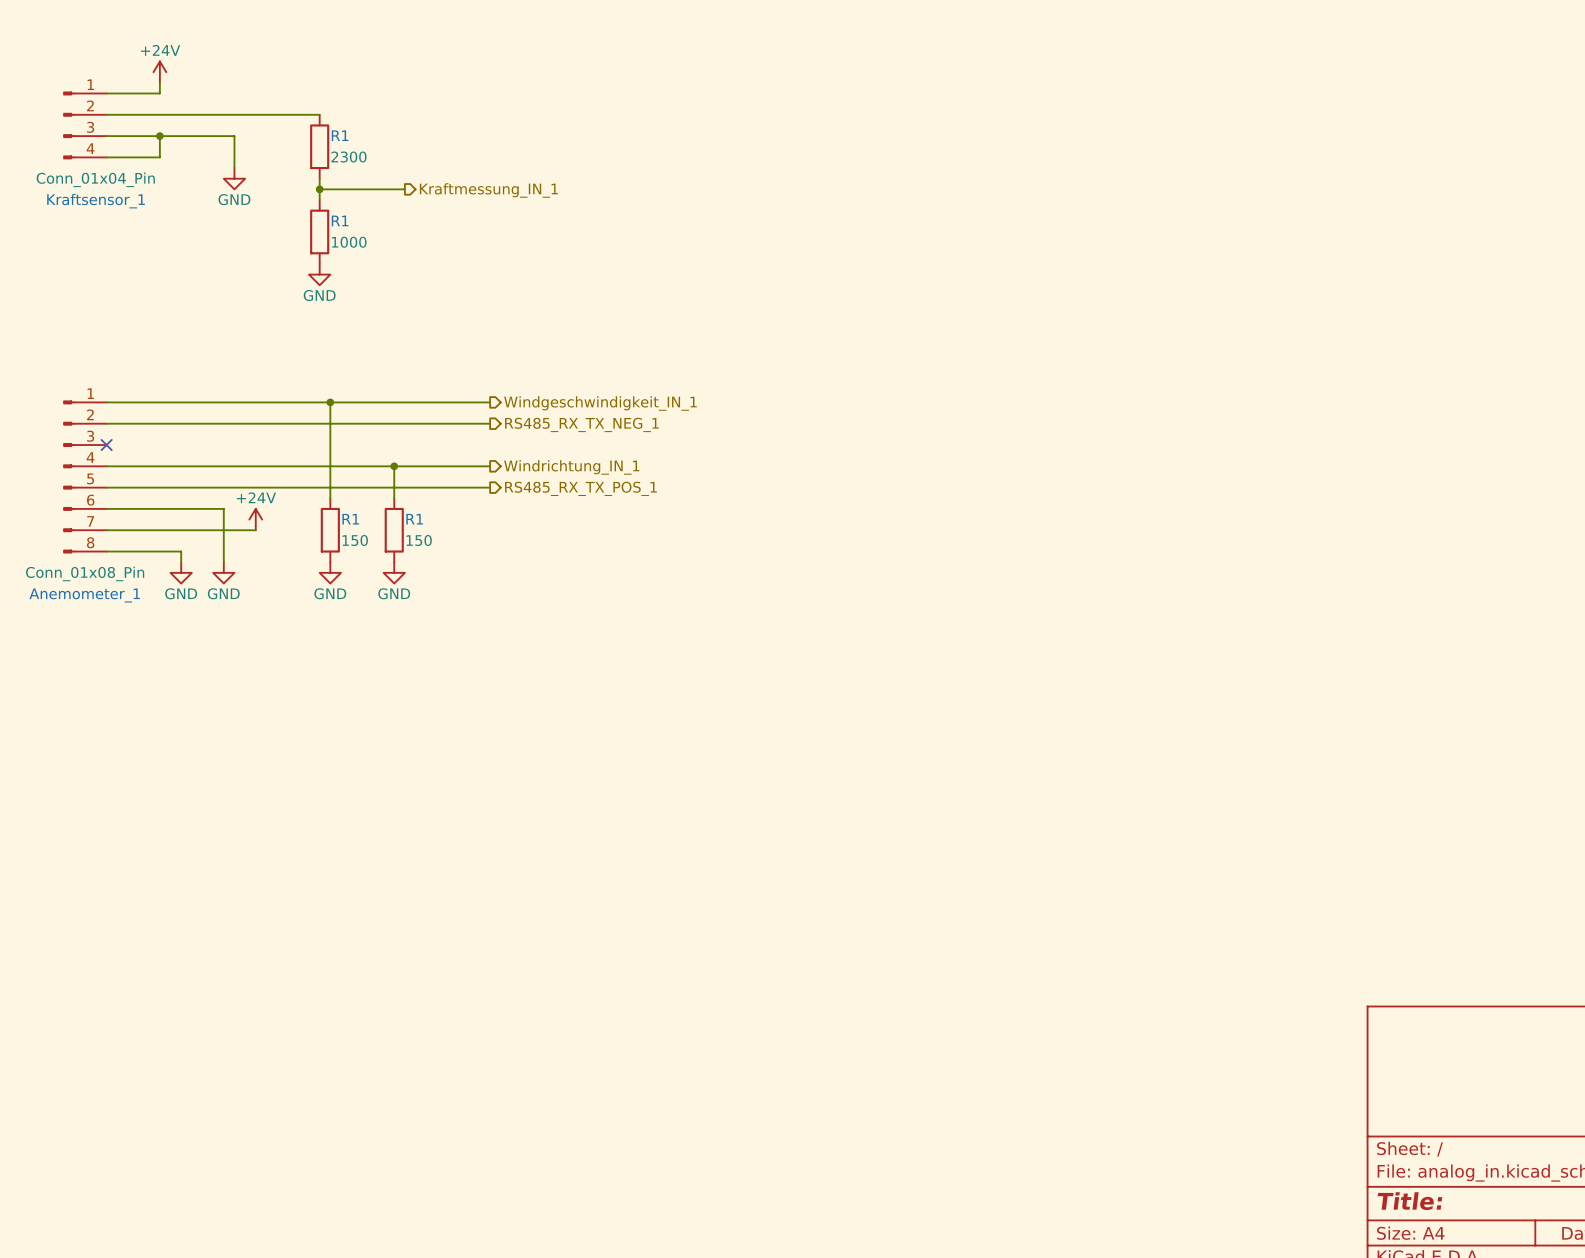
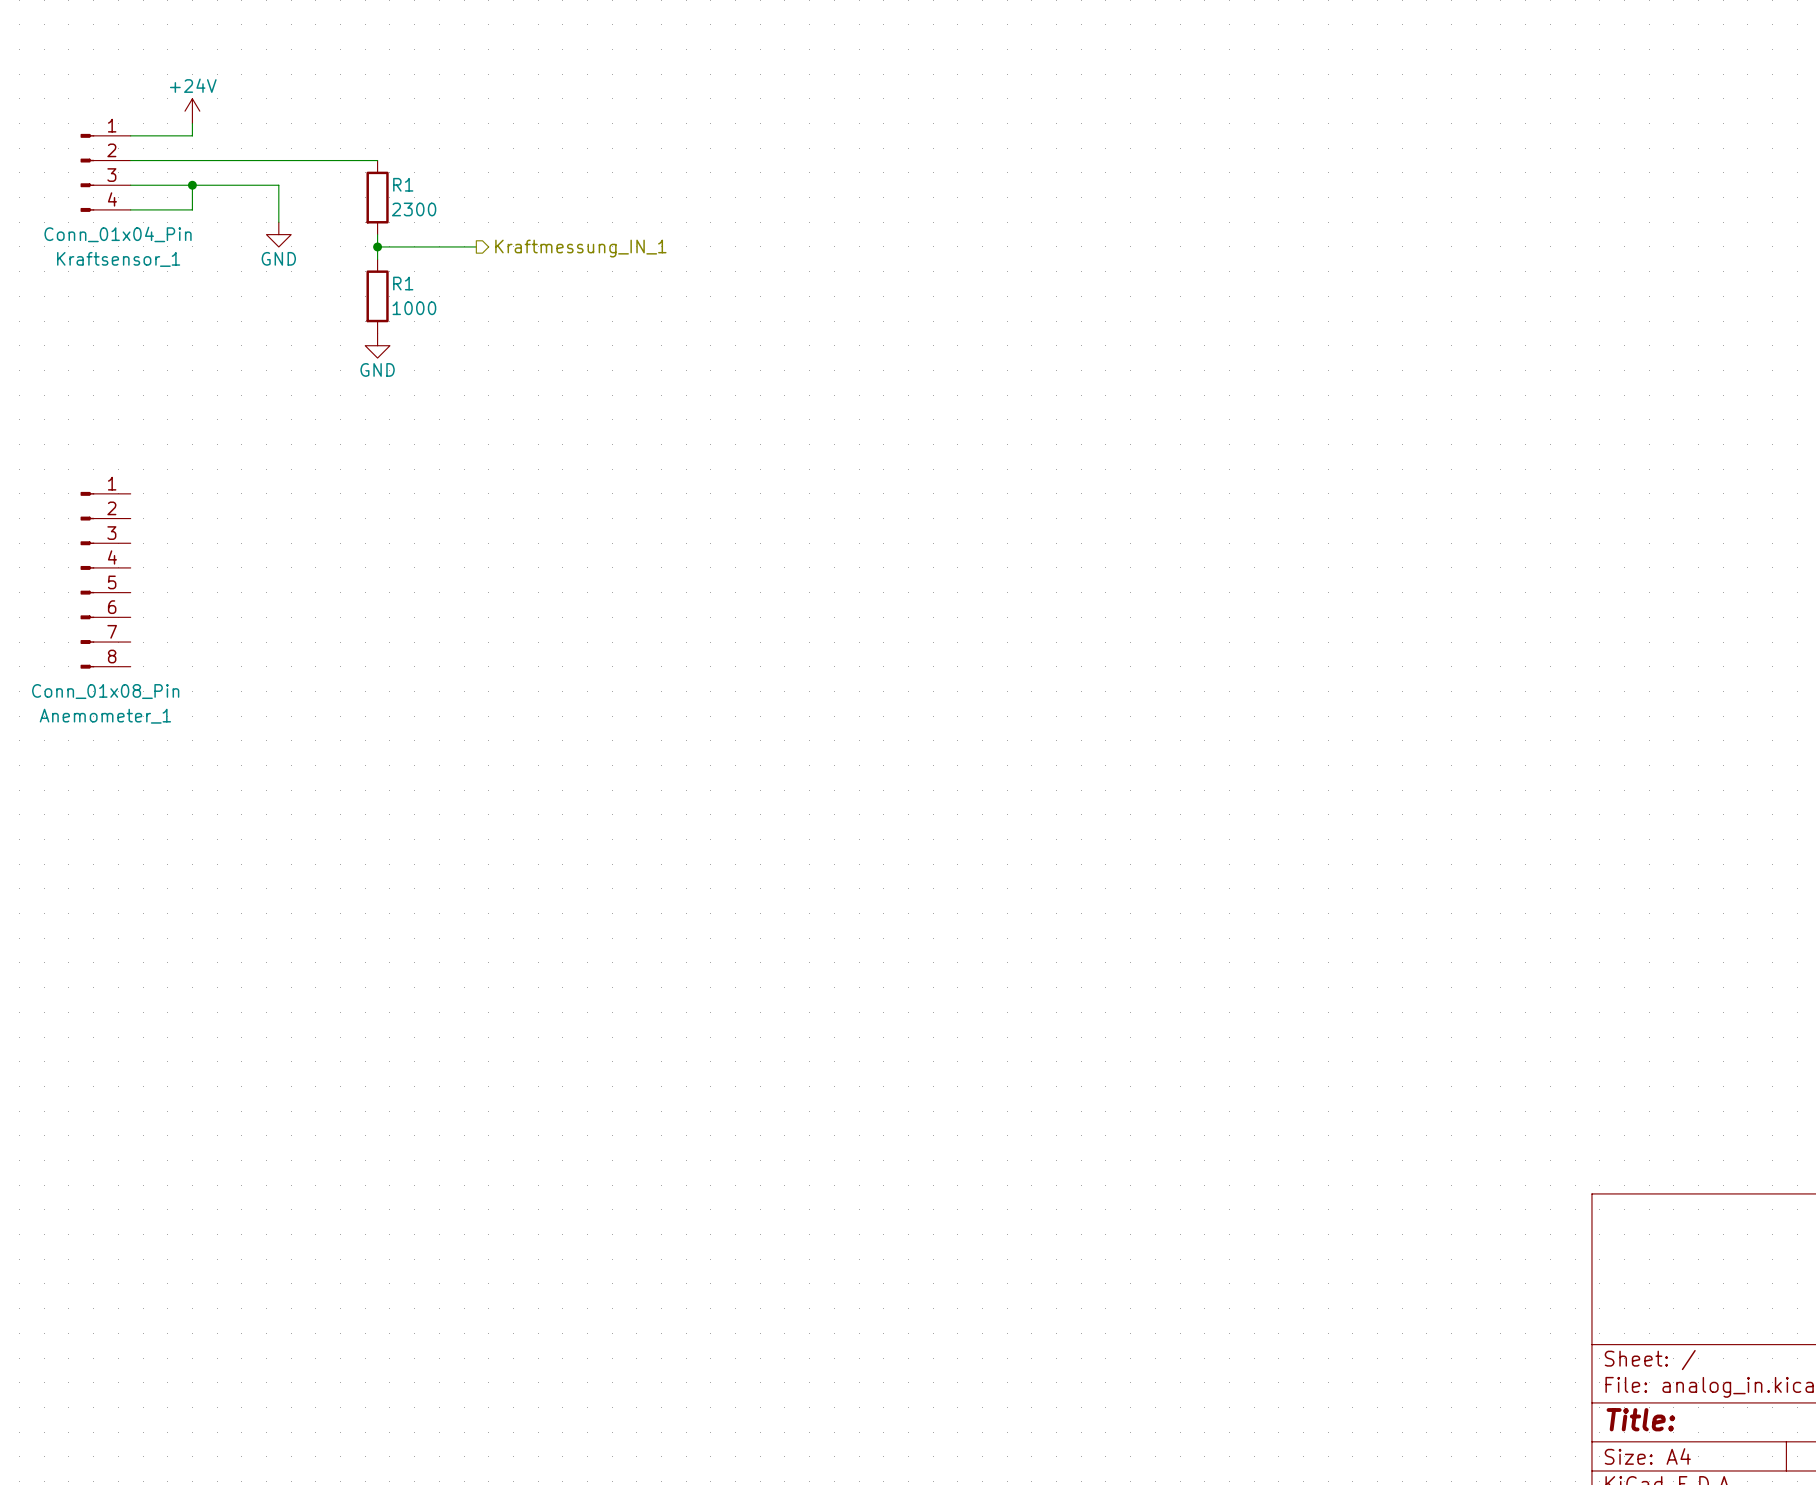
wire: (106, 402) (490, 402) -> none
wire: (330, 402) (330, 498) -> none
junction: (330, 402) -> none
hierarchical label: Windgeschwindigkeit_IN_1 (600, 403) -> none
wire: (106, 423) (490, 423) -> none
hierarchical label: RS485_RX_TX_NEG_1 (581, 424) -> none
no-connect mark: (106, 445) -> none
wire: (106, 466) (490, 466) -> none
wire: (394, 466) (394, 498) -> none
junction: (394, 466) -> none
hierarchical label: Windrichtung_IN_1 (571, 467) -> none
wire: (106, 487) (490, 487) -> none
hierarchical label: RS485_RX_TX_POS_1 (580, 488) -> none
wire: (106, 508) (223, 508) (223, 562) -> none
power symbol: +24V (255, 519) -> none
wire: (106, 530) (255, 530) -> none
R1: 150 (330, 530) -> none
R1: 150 (394, 530) -> none
wire: (106, 551) (181, 551) (181, 562) -> none
power symbol: GND (181, 572) -> none
power symbol: GND (223, 572) -> none
power symbol: GND (330, 572) -> none
power symbol: GND (394, 572) -> none

